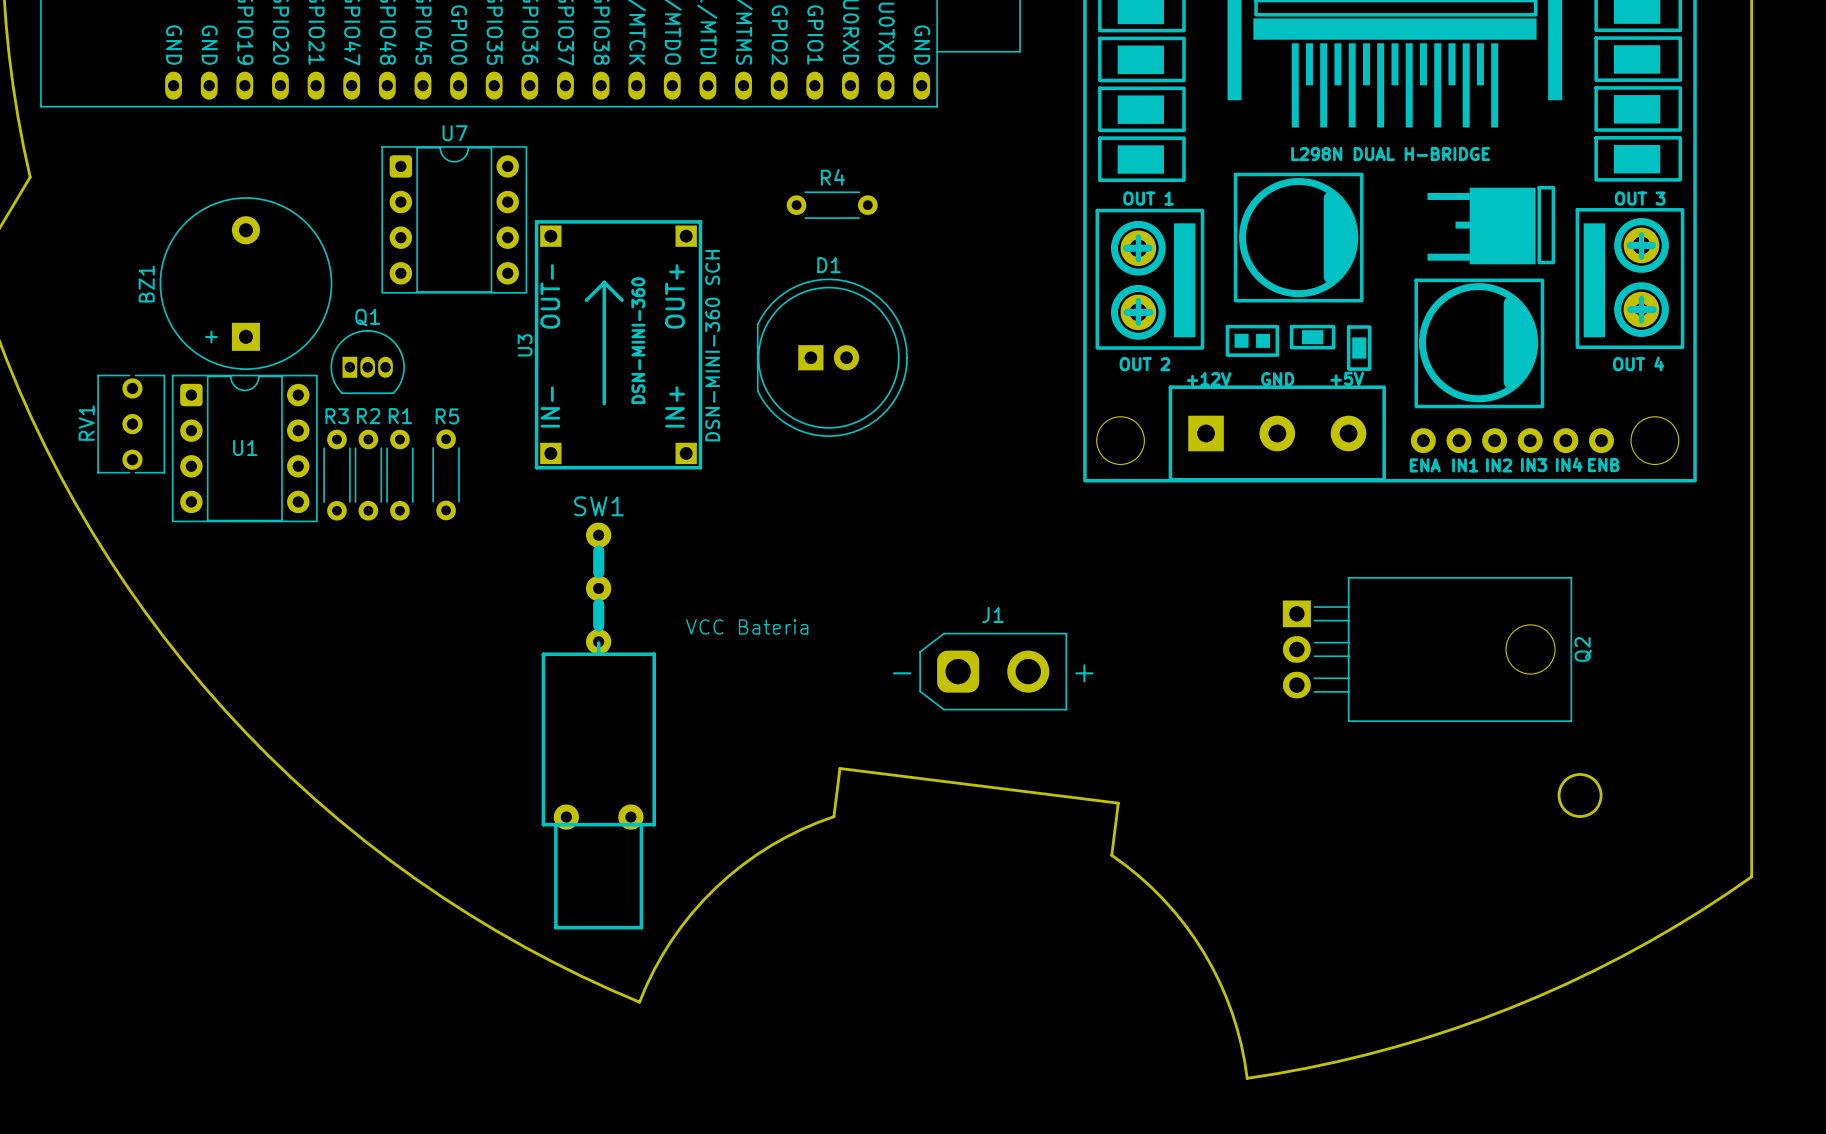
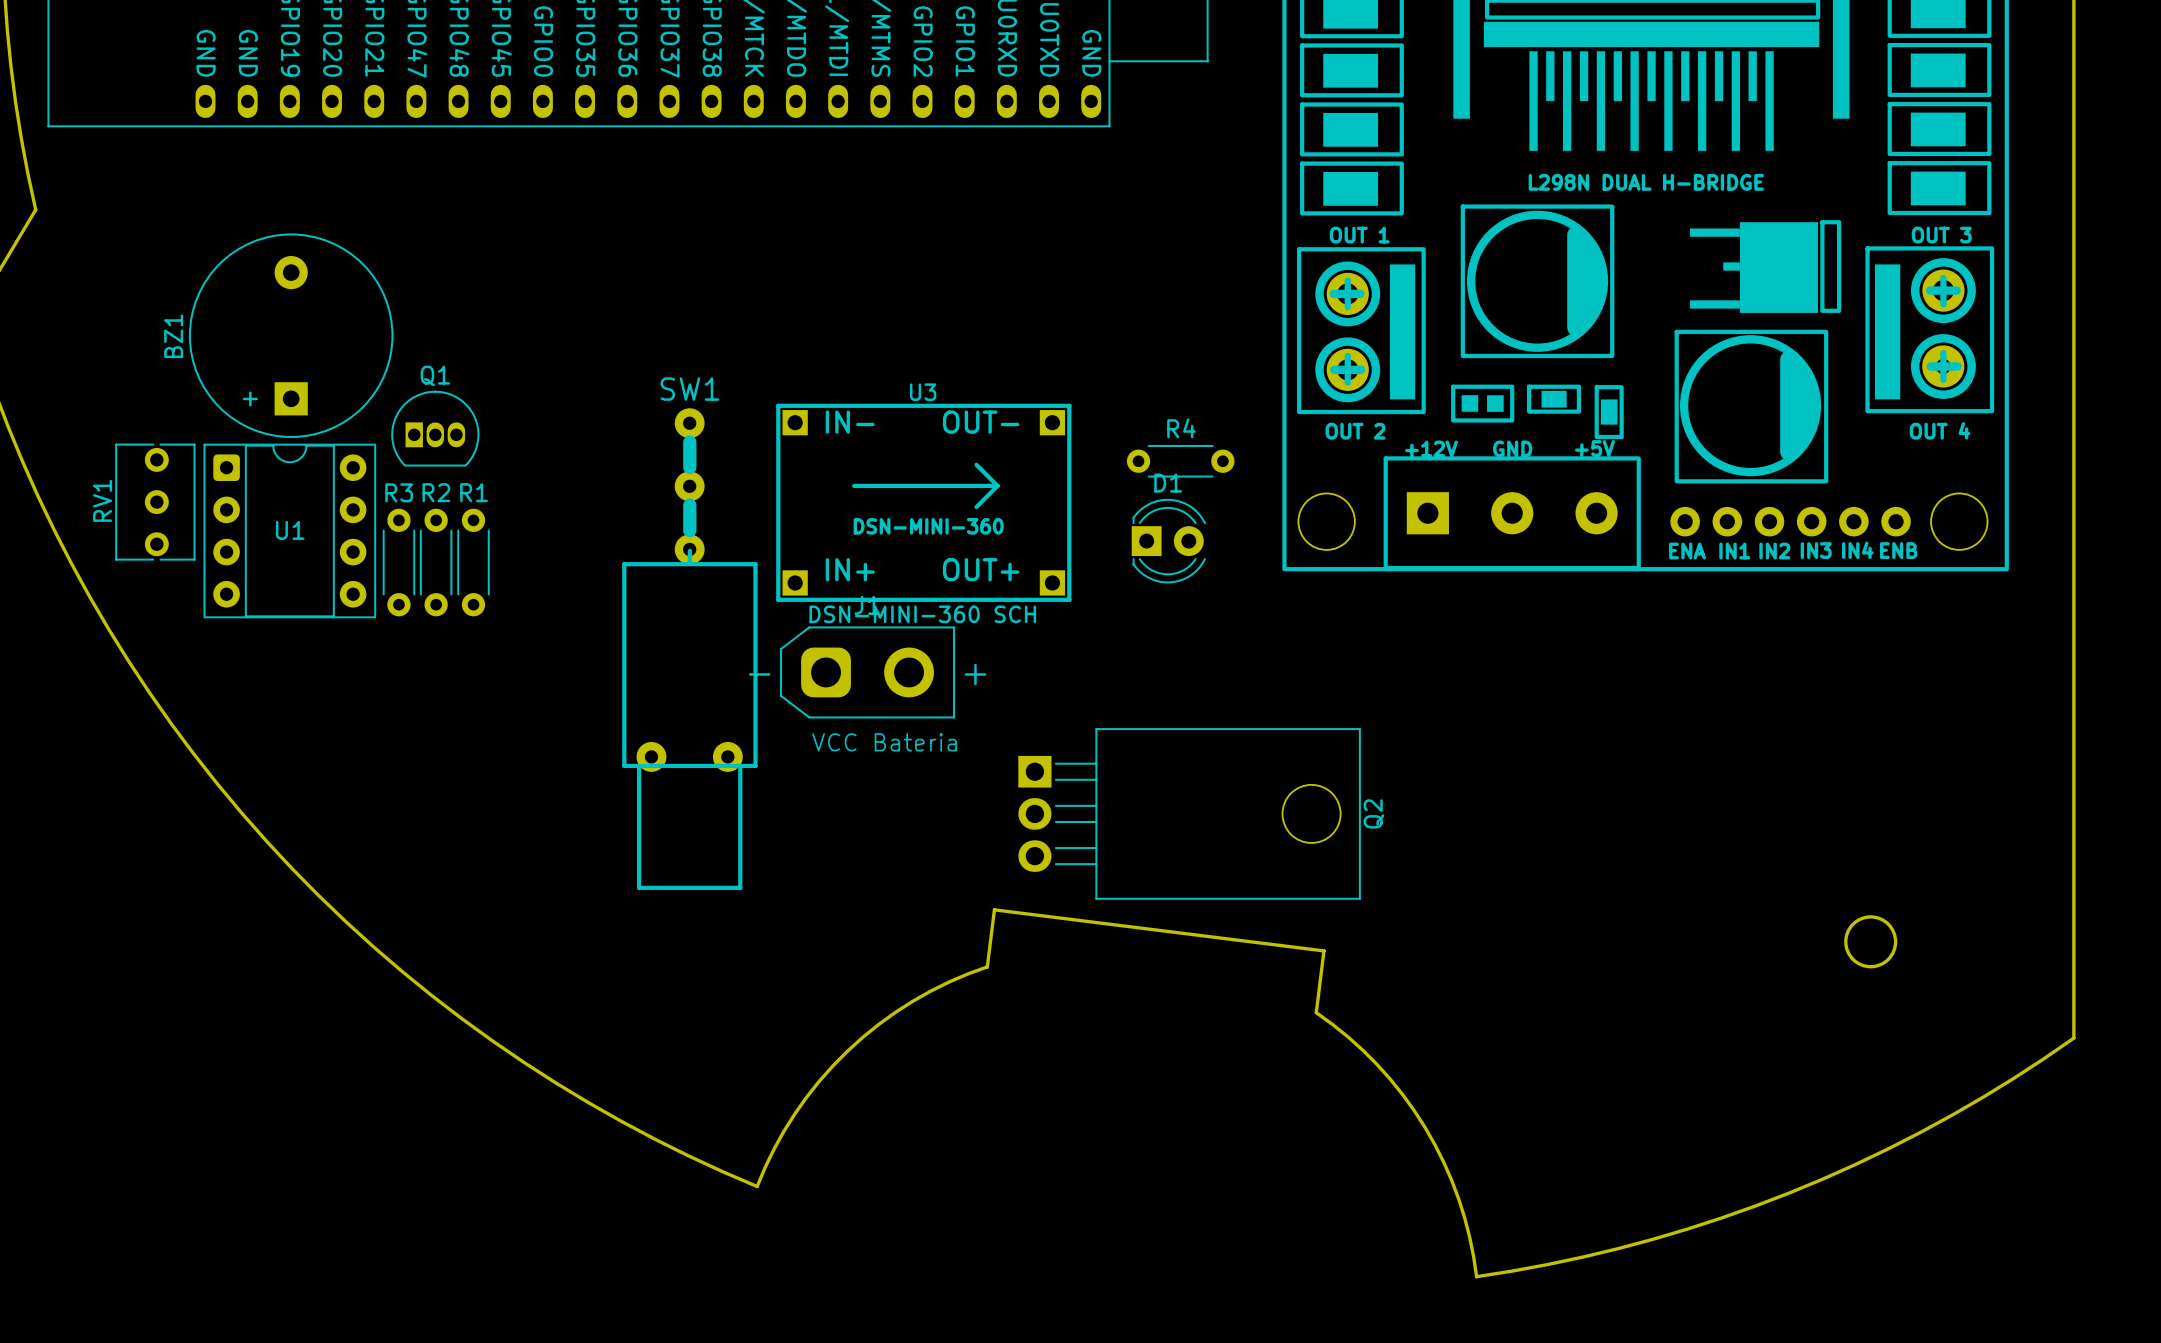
R4 position: (832, 205) -> (1180, 461)
U7: (454, 219) -> none
D1 name position: D1 (829, 265) -> D1 (1168, 483)
D1 footprint: [756, 278, 908, 437] -> [1131, 498, 1207, 584]
U3 rotation: 0° (618, 344) -> 90° clockwise (923, 502)
U3 position: (618, 344) -> (923, 502)
R5: (446, 474) -> none
Q2 position: (1427, 649) -> (1189, 813)
J1 position: (993, 671) -> (867, 672)
SW1 position: (598, 726) -> (689, 649)

